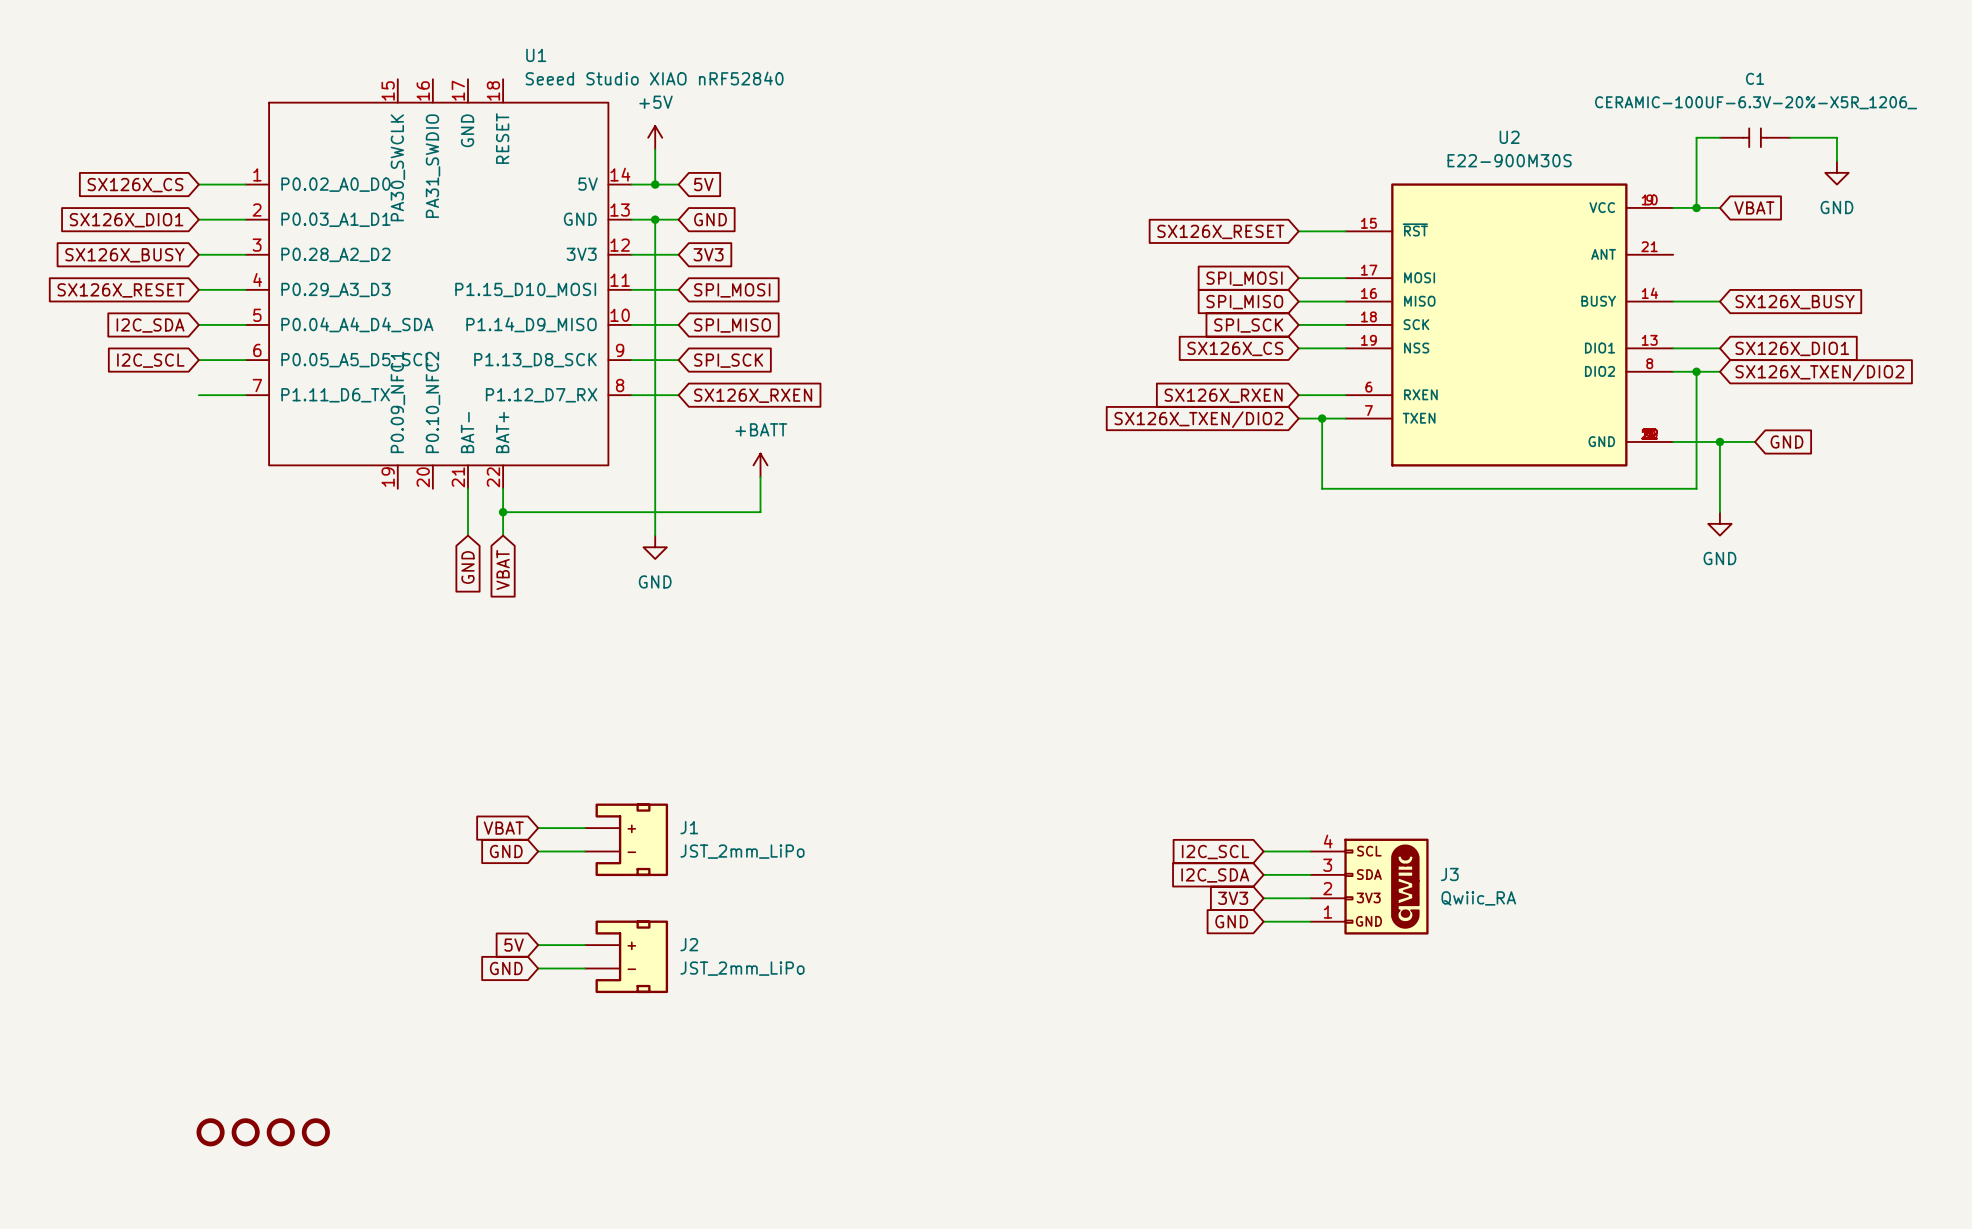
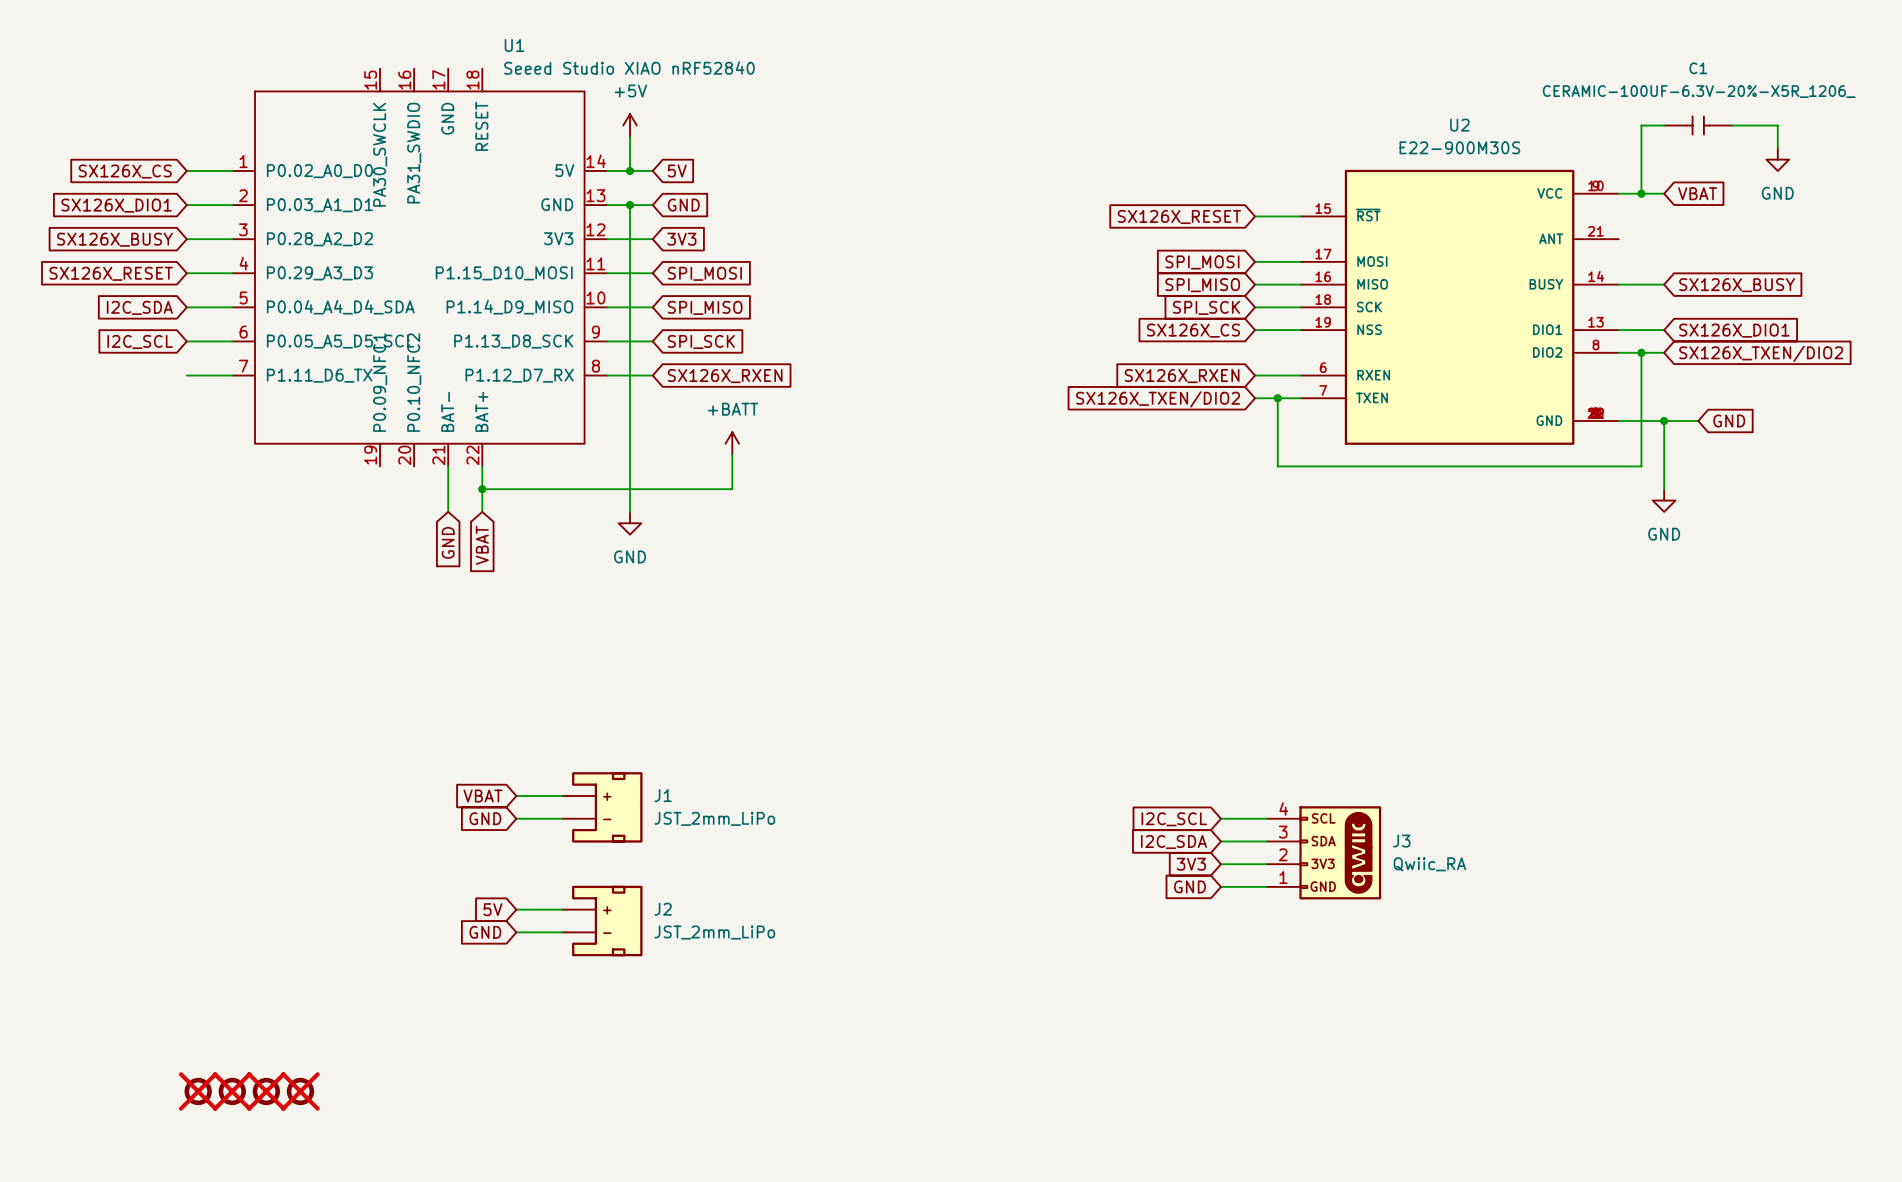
part do-not-place cross: none -> (198, 1091)
part do-not-place cross: none -> (232, 1091)
part do-not-place cross: none -> (266, 1091)
part do-not-place cross: none -> (300, 1091)

